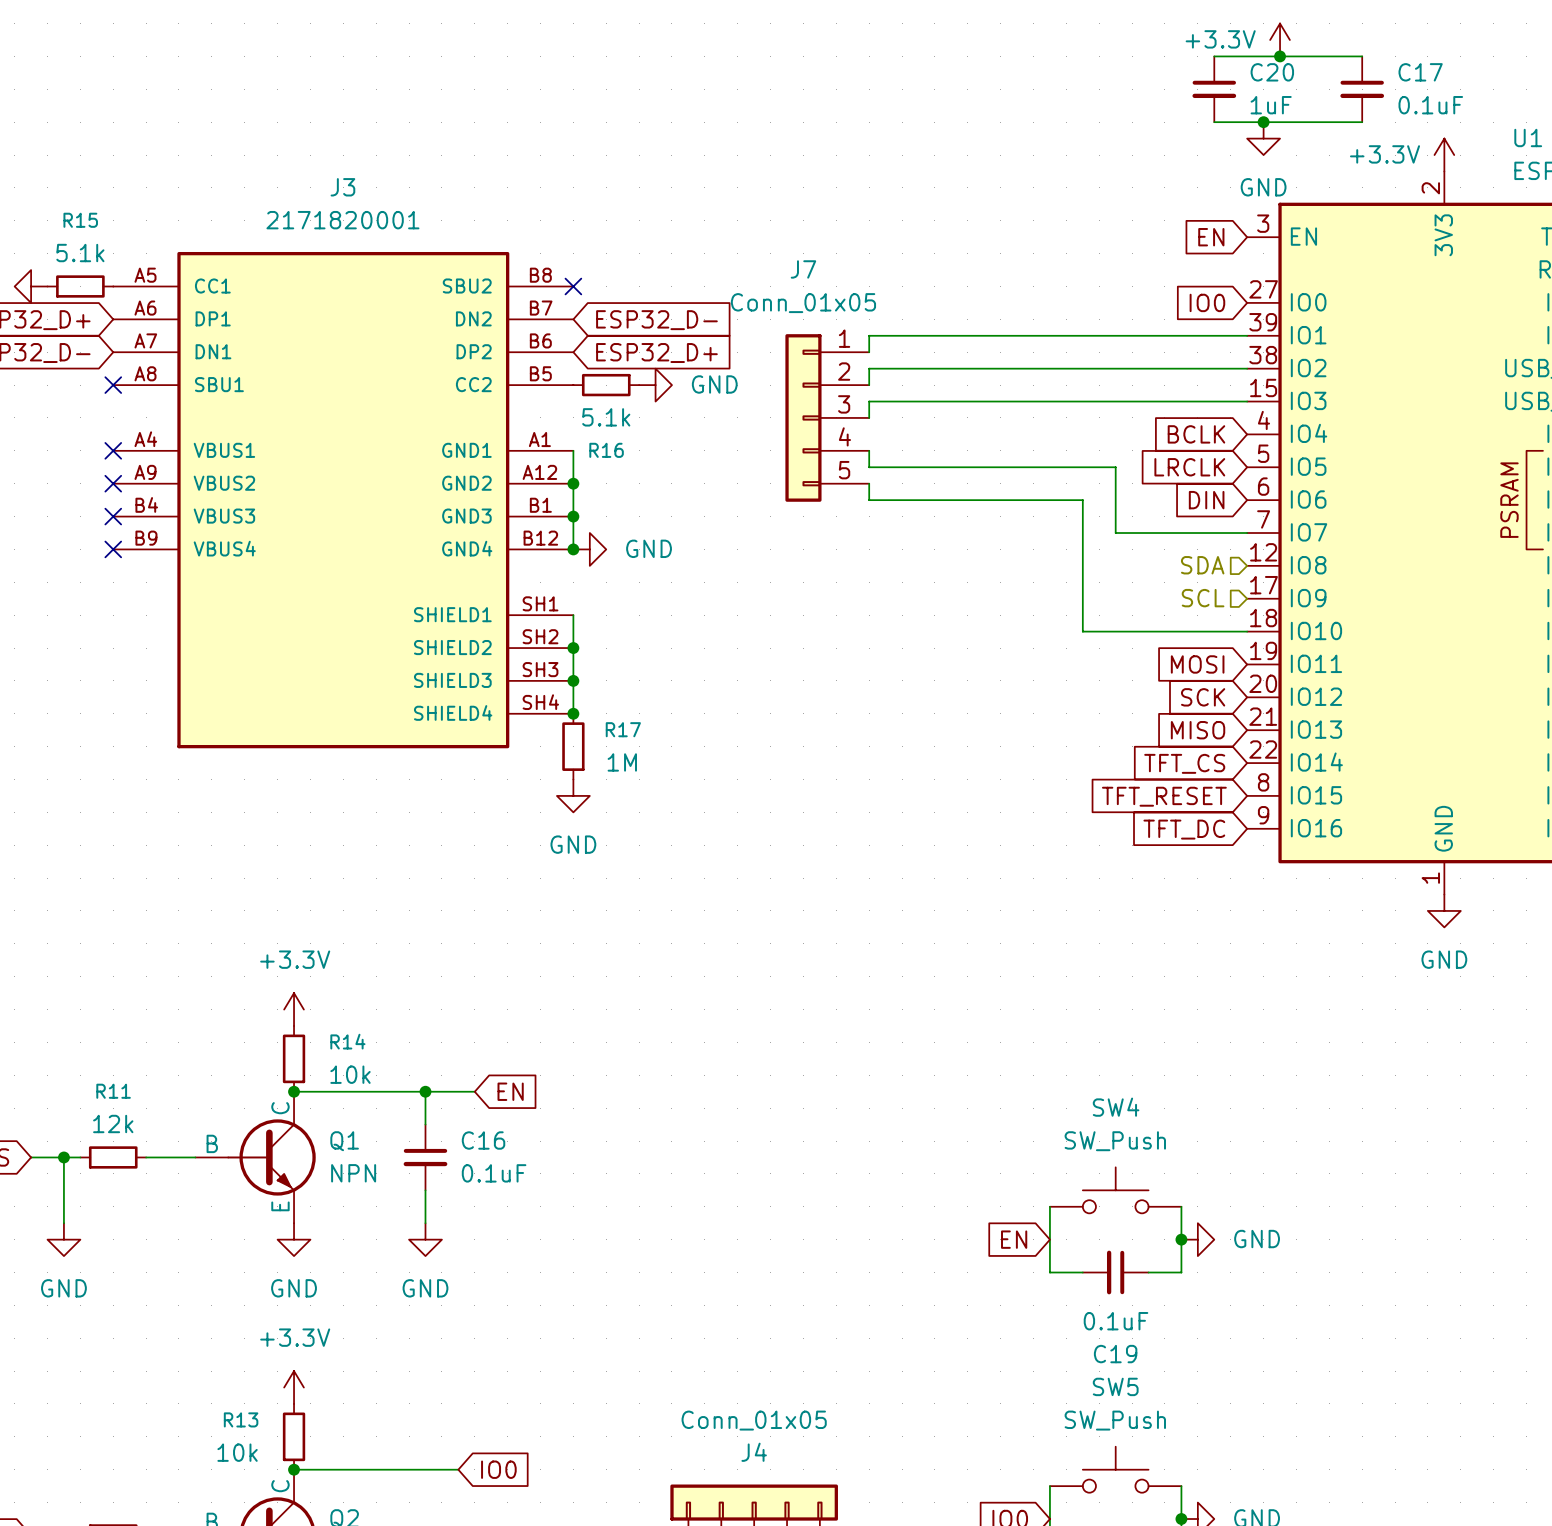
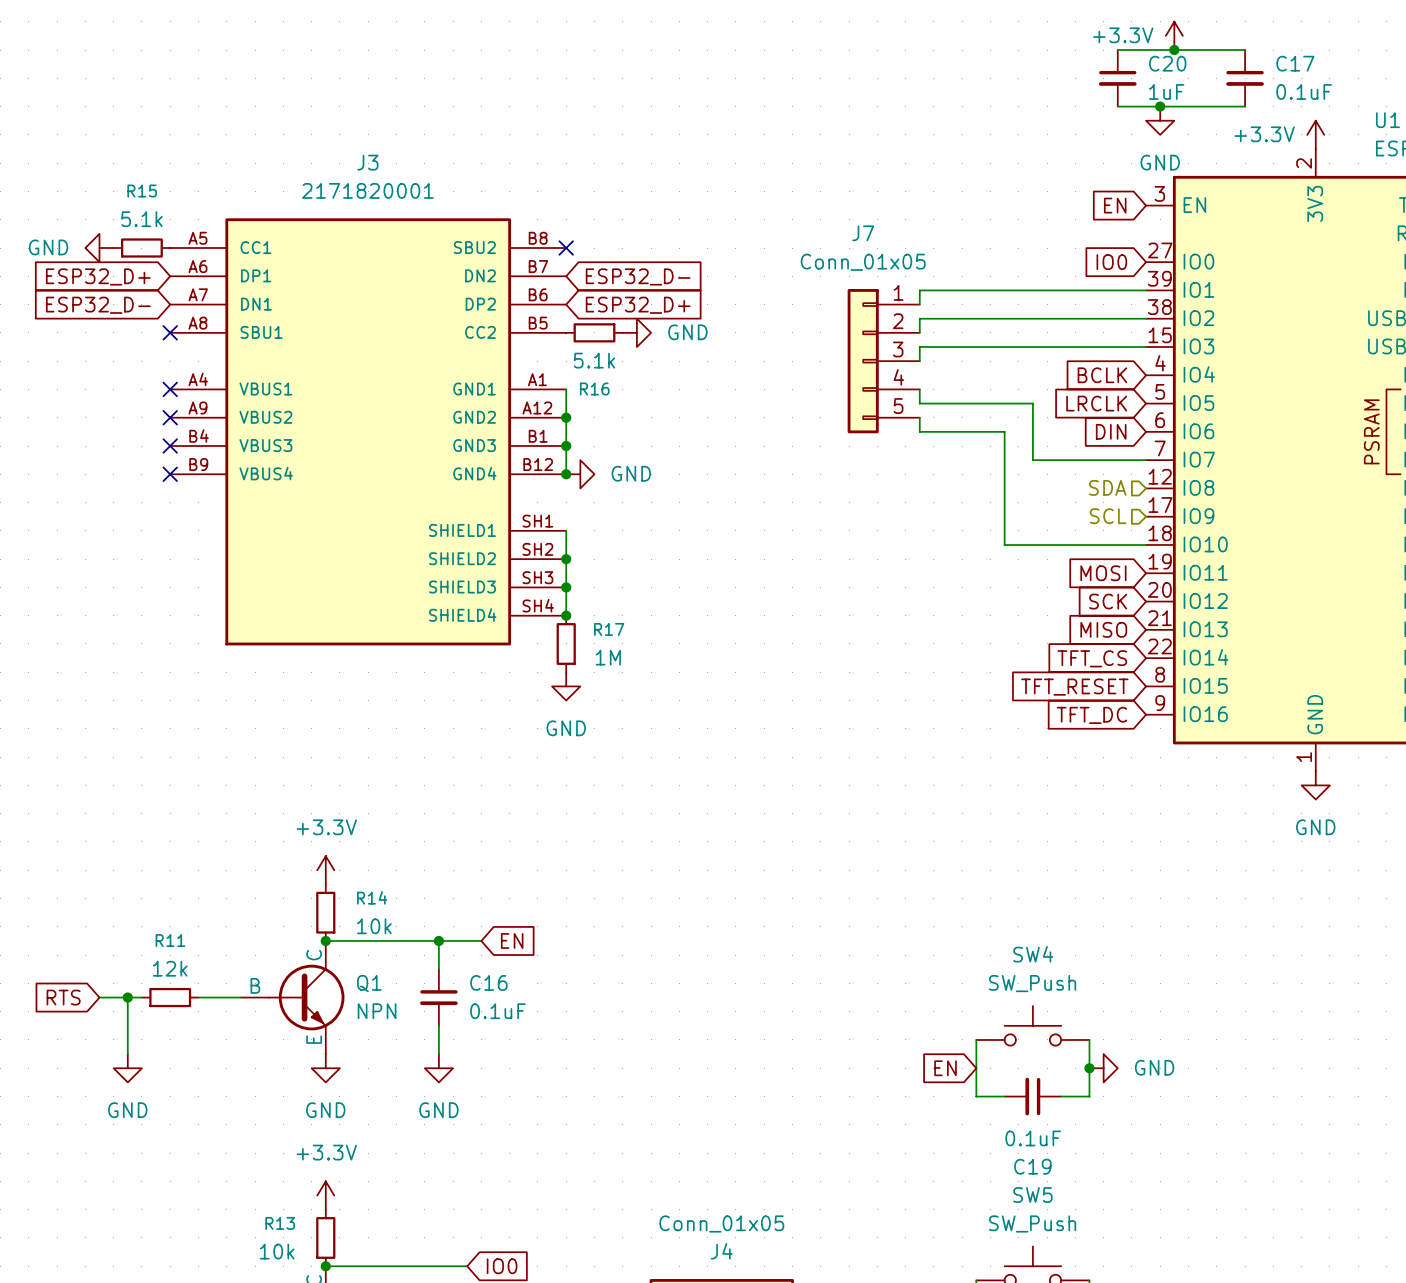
wire: (984, 335) (869, 335) (869, 352) -> (919, 290) (919, 304)
wire: (984, 368) (869, 368) (869, 385) -> (919, 318) (919, 332)
wire: (984, 401) (869, 401) (869, 417) -> (919, 347) (919, 361)
J7 position: (827, 417) -> (883, 361)
wire: (869, 450) (869, 467) (984, 467) -> (919, 389) (919, 403)
wire: (869, 483) (869, 500) (984, 500) -> (919, 417) (919, 431)

